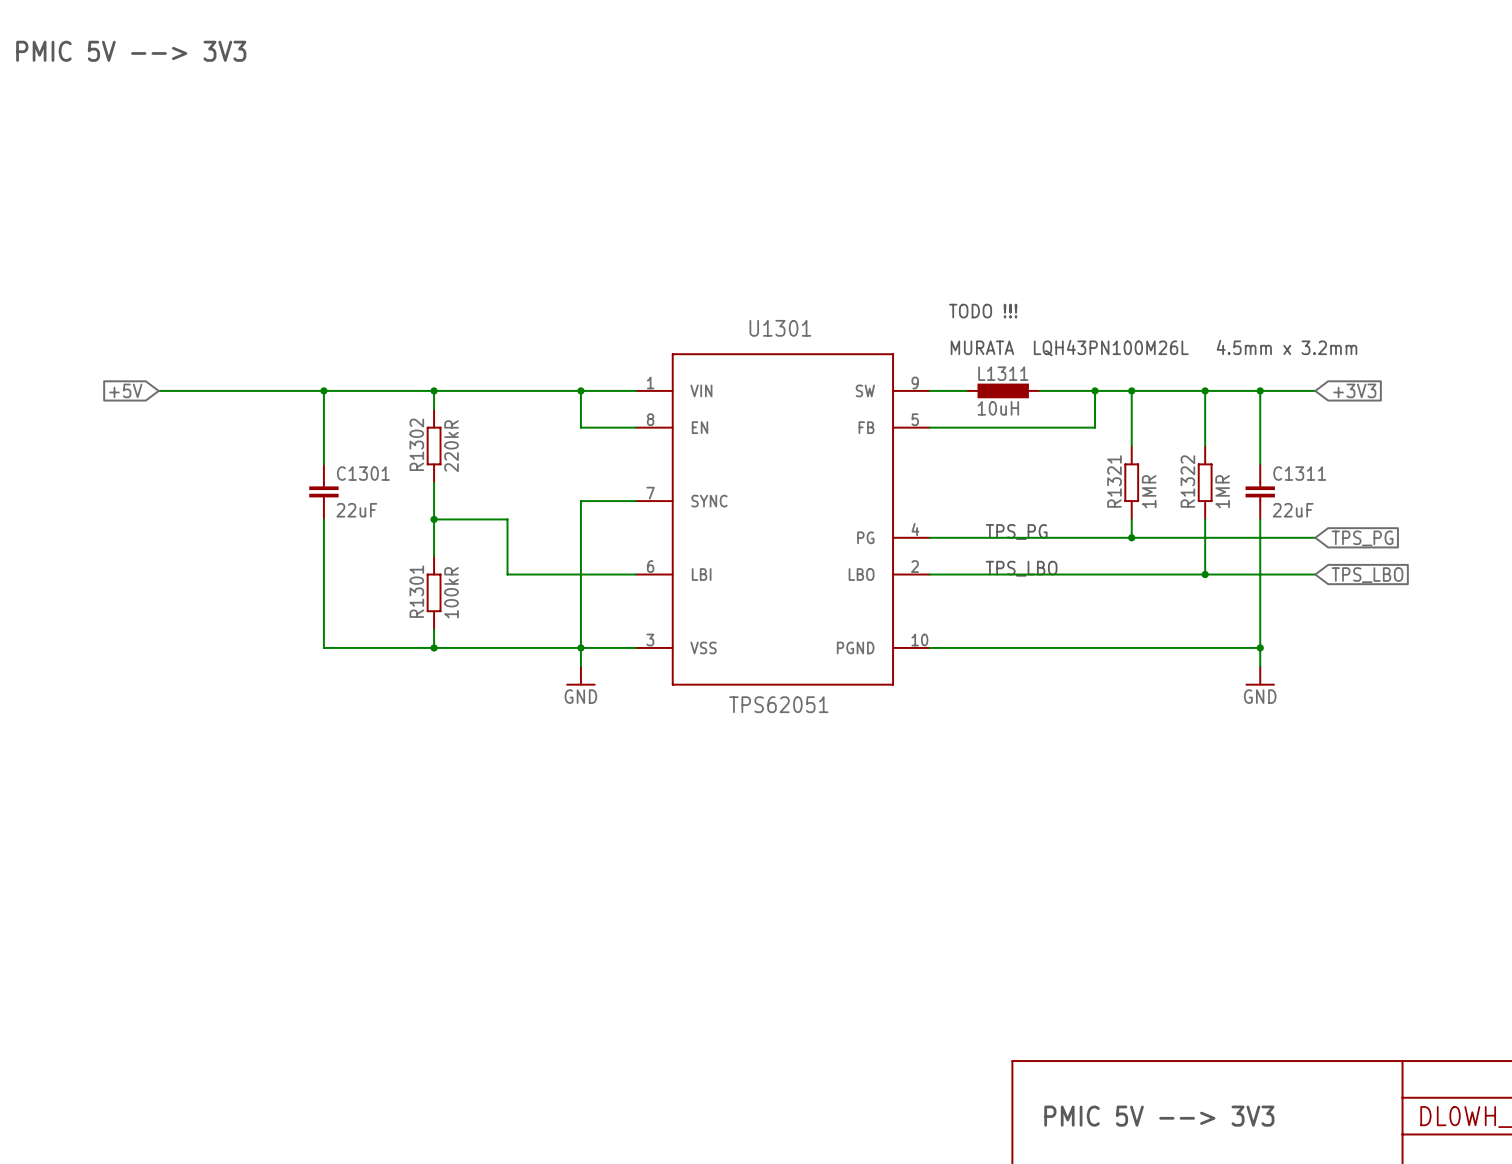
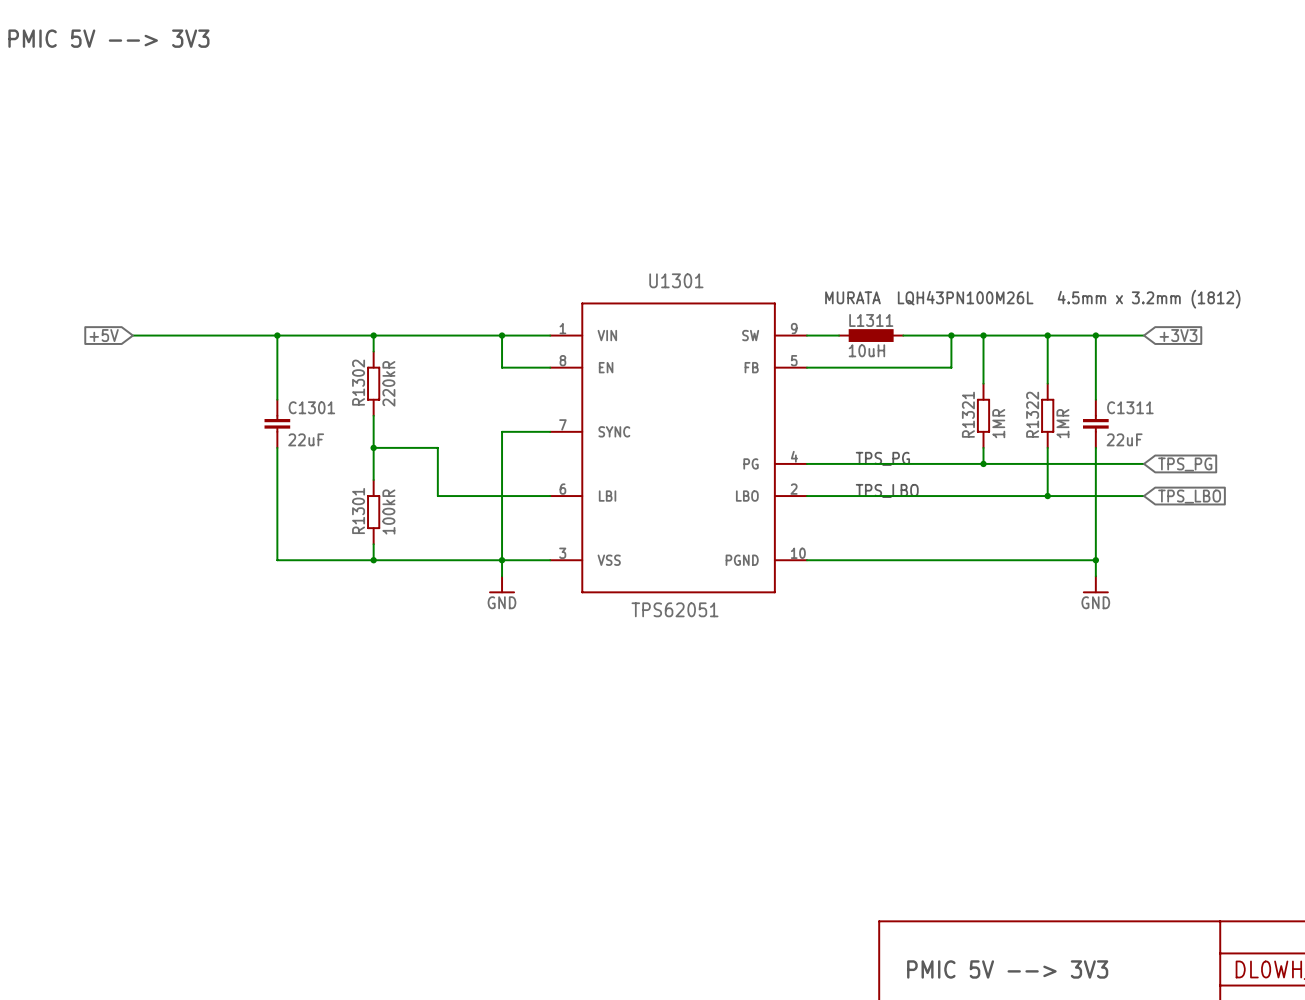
text: TODO !!! (983, 311) -> none
text: MURATA LQH43PN100M26L 4.5mm x 3.2mm (1153, 348) -> MURATA LQH43PN100M26L 4.5mm x 3.2mm (1812) (1032, 299)

